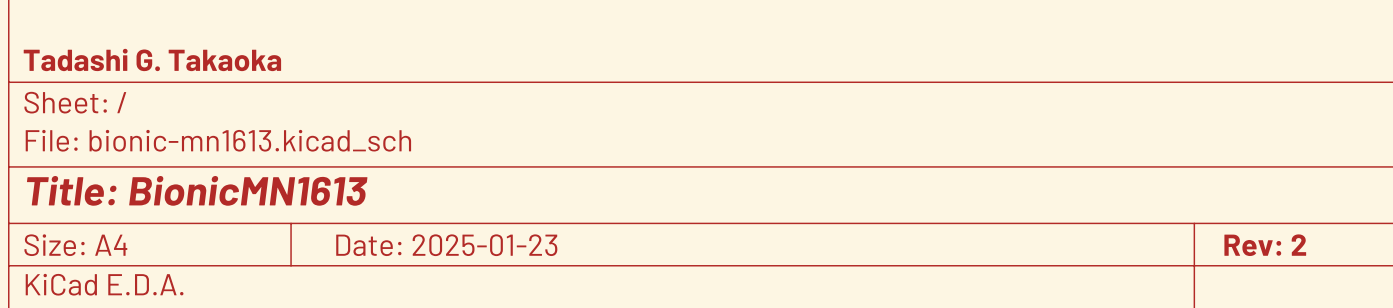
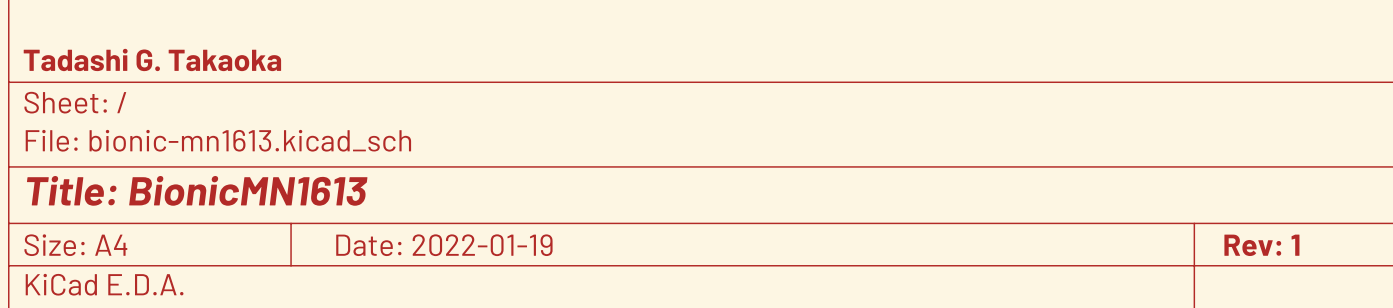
title block: Date: 2025-01-23 (446, 245) -> Date: 2022-01-19 (444, 245)
title block: Rev: 2 (1265, 245) -> Rev: 1 (1261, 245)

